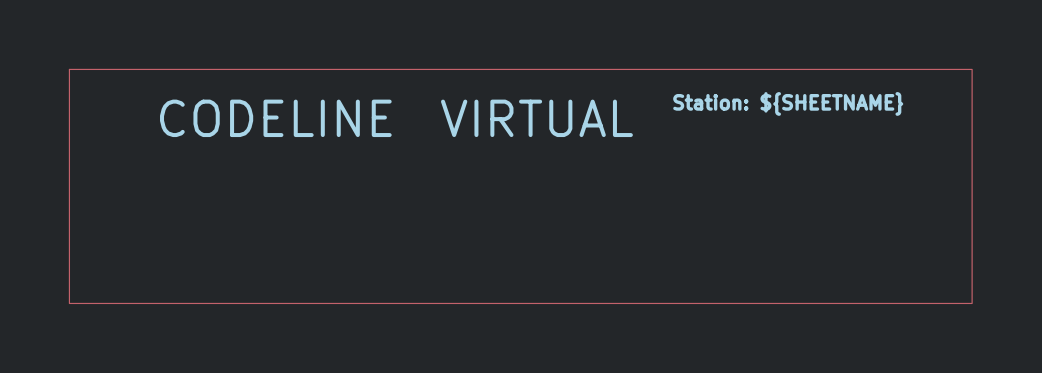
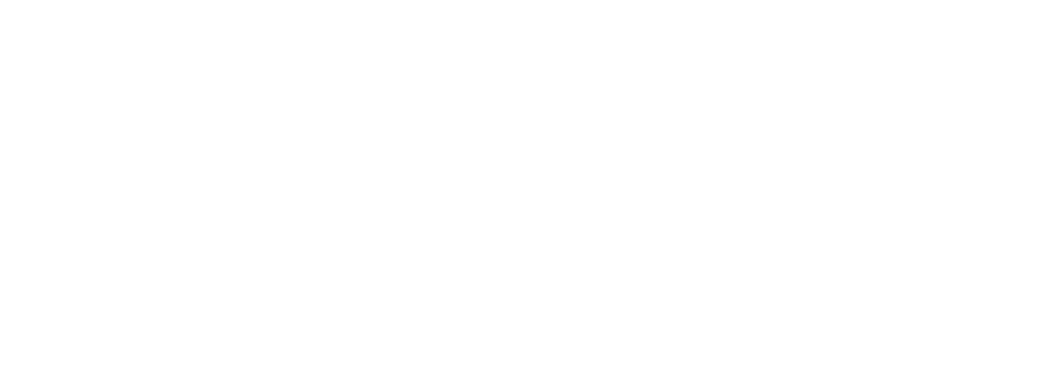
part: VIRTUAL (520, 186) -> none

